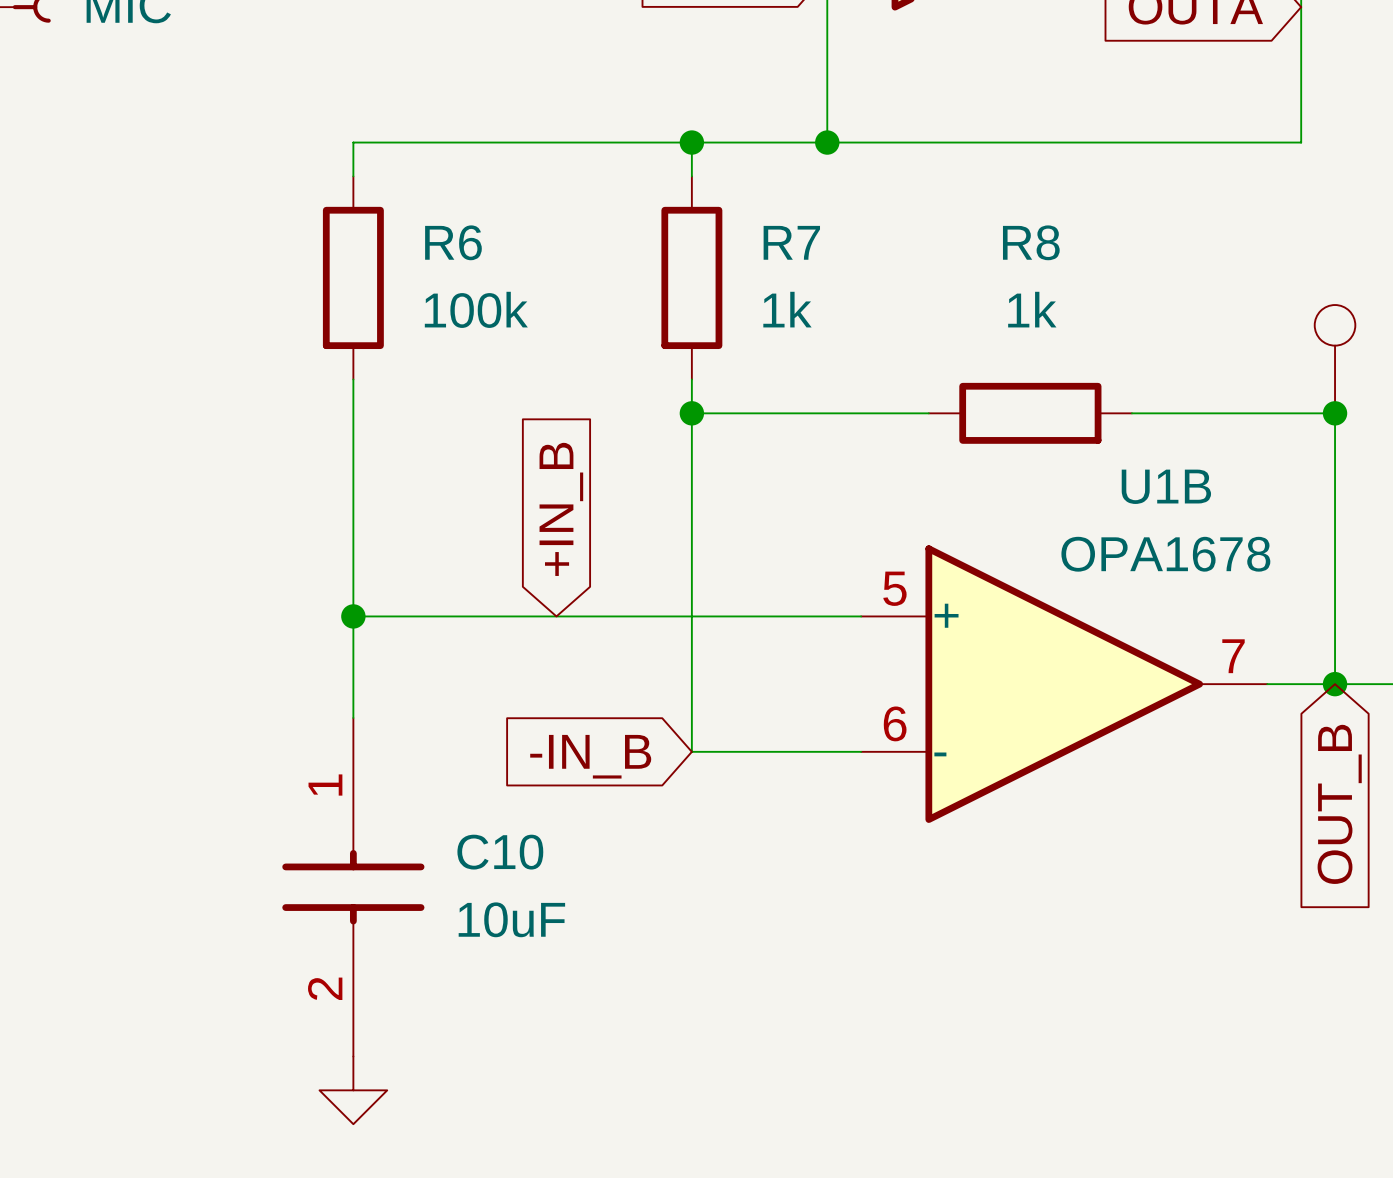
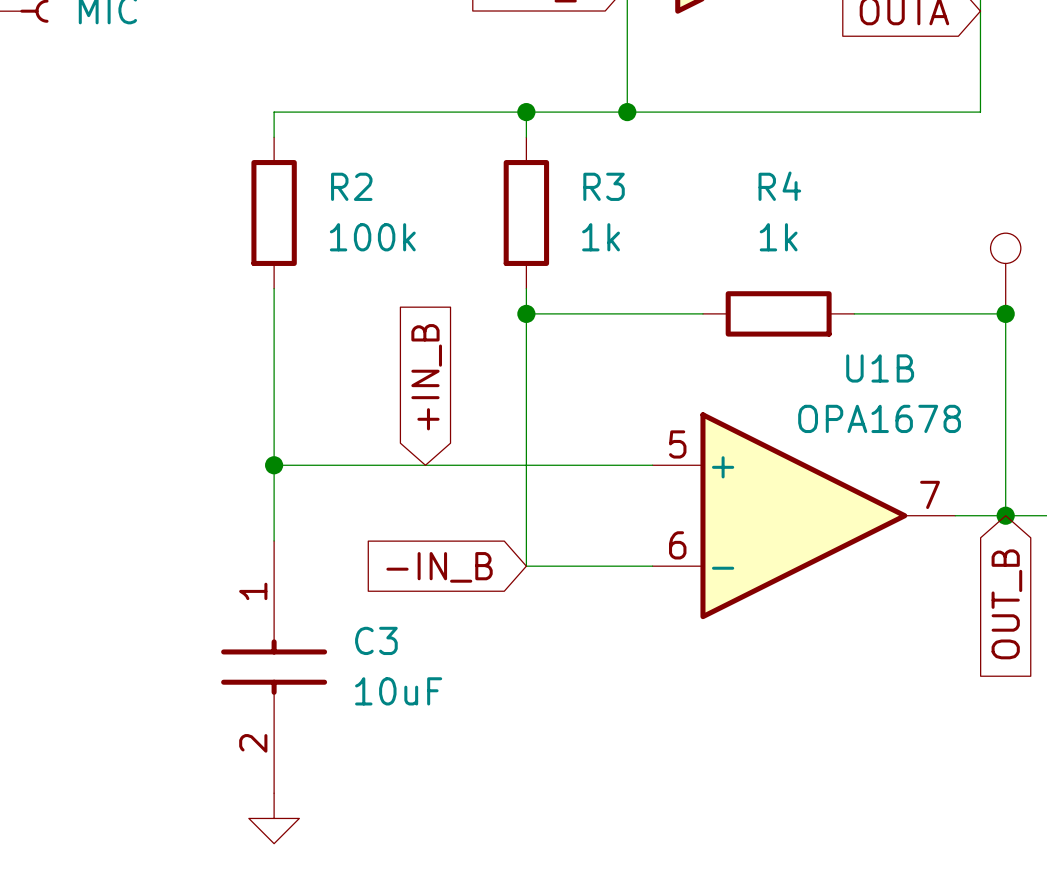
R6 name: R6 (453, 242) -> R2 (351, 186)
R7 name: R7 (791, 242) -> R3 (604, 186)
R8 name: R8 (1031, 242) -> R4 (779, 186)
C10 name: C10 (500, 852) -> C3 (376, 640)

